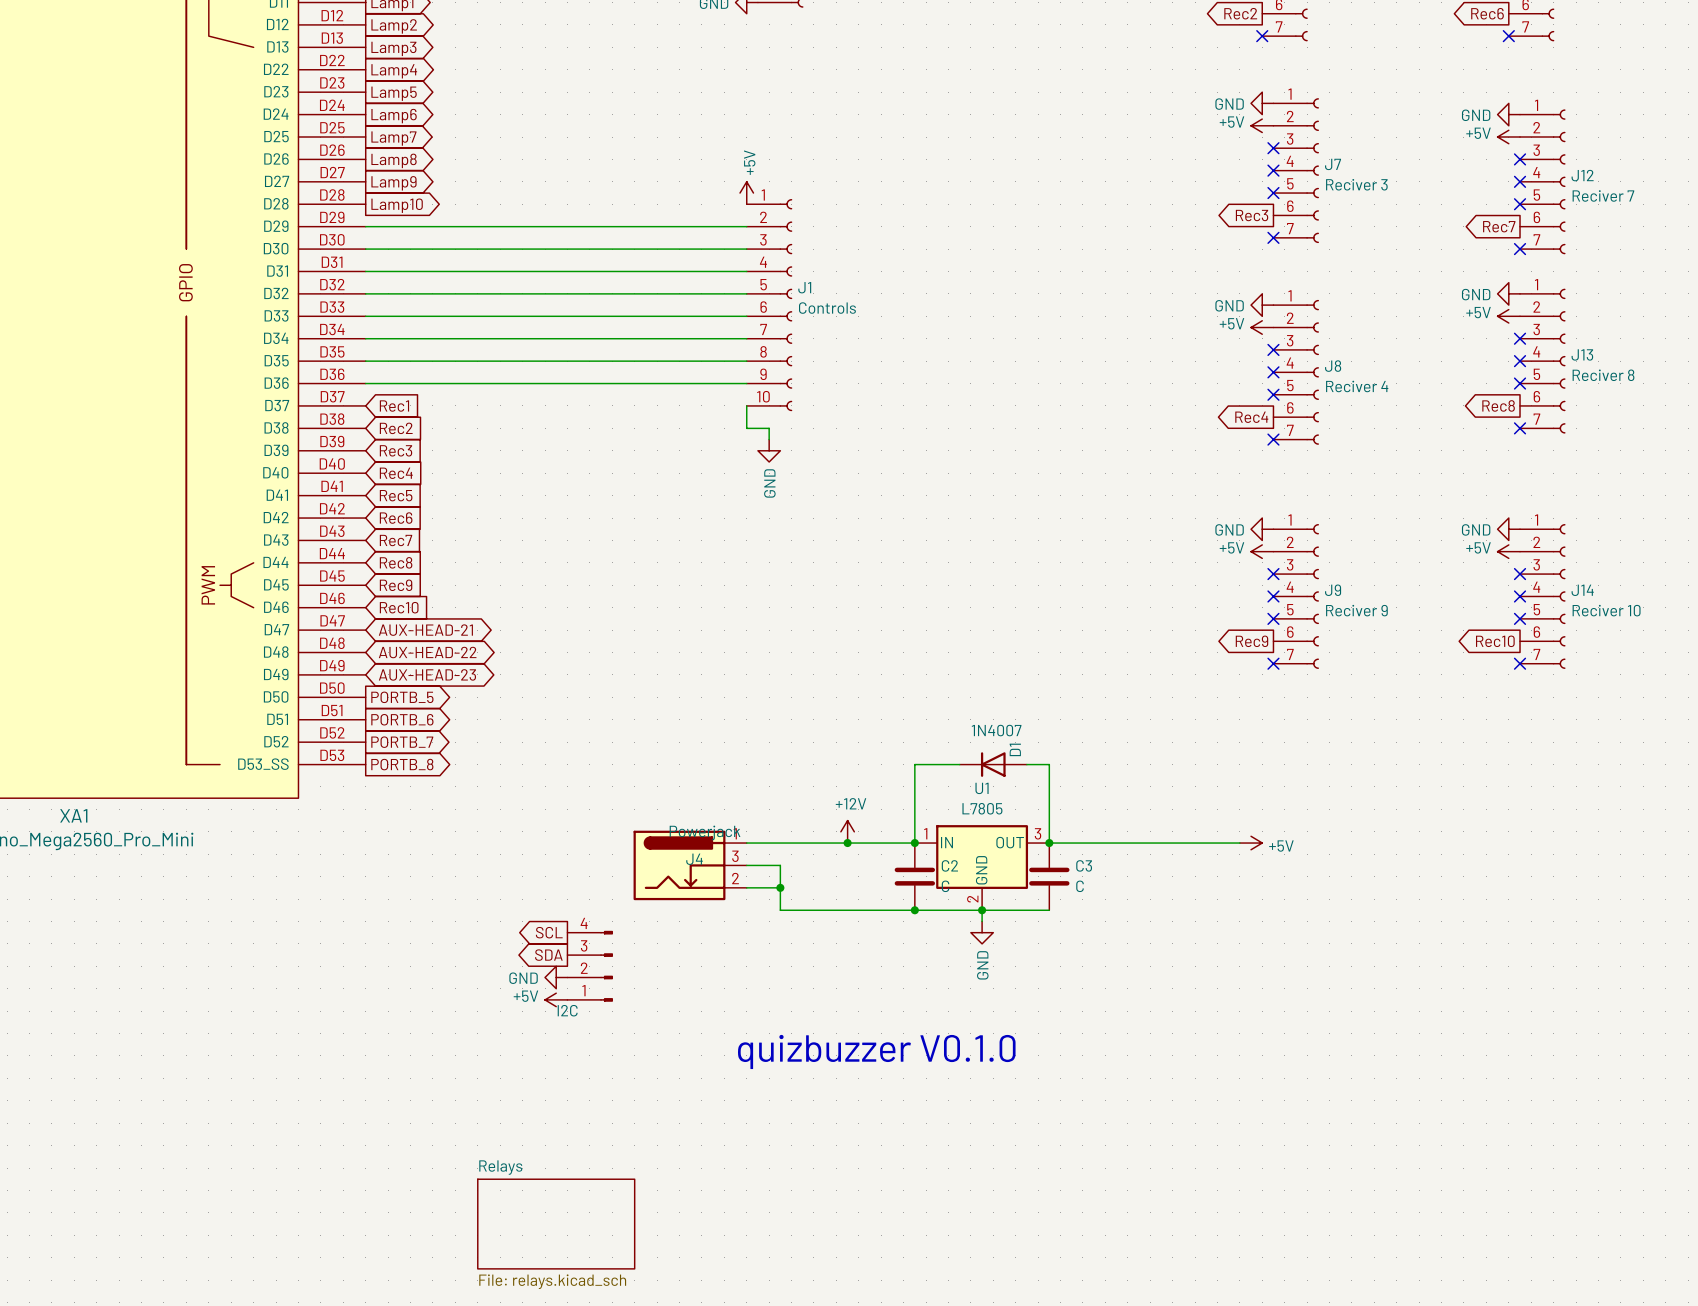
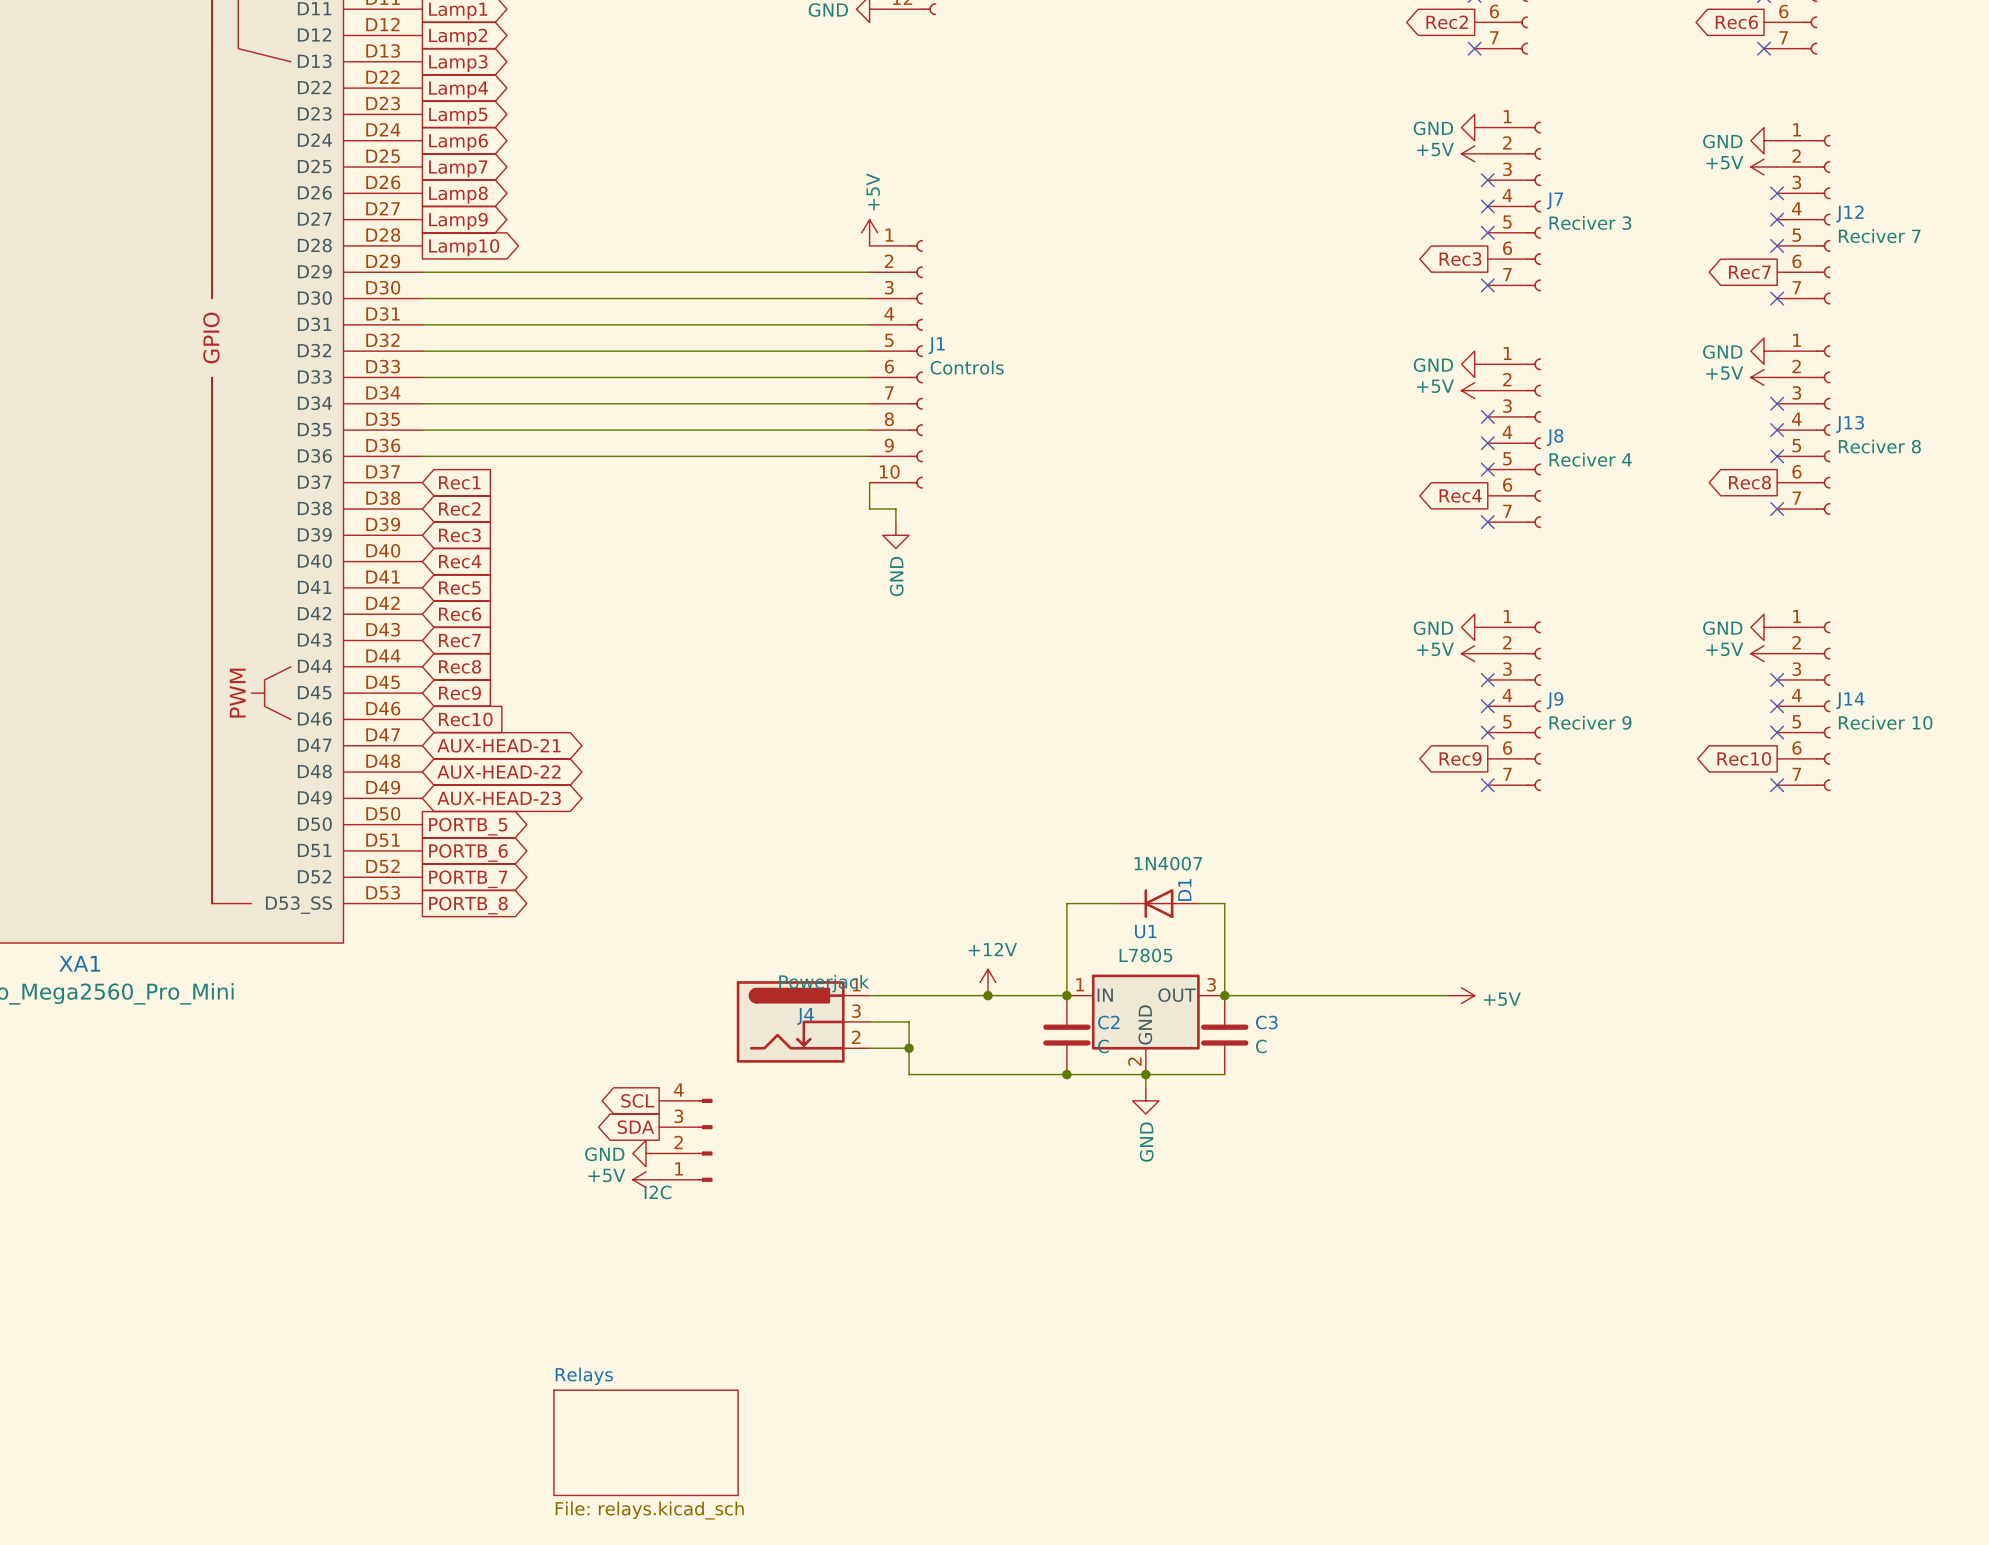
text: quizbuzzer V0.1.0 (876, 1051) -> none

